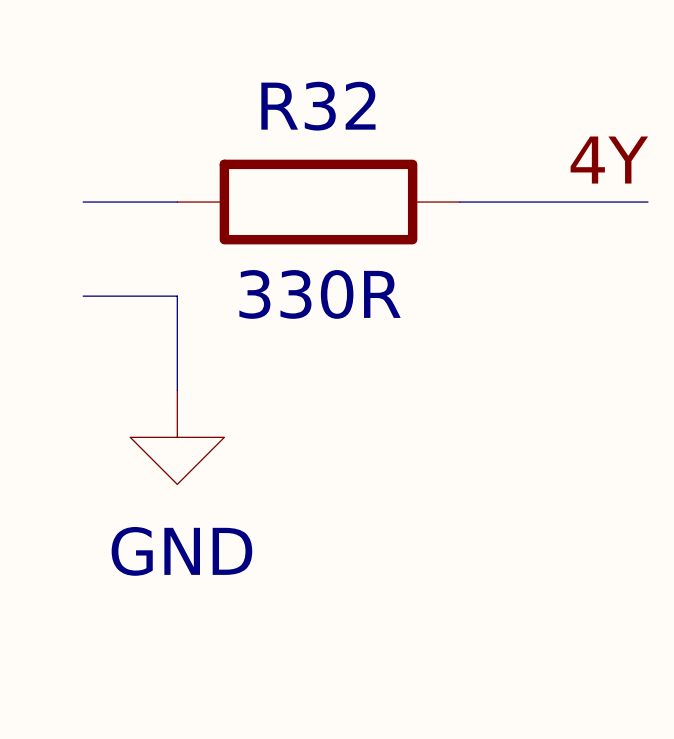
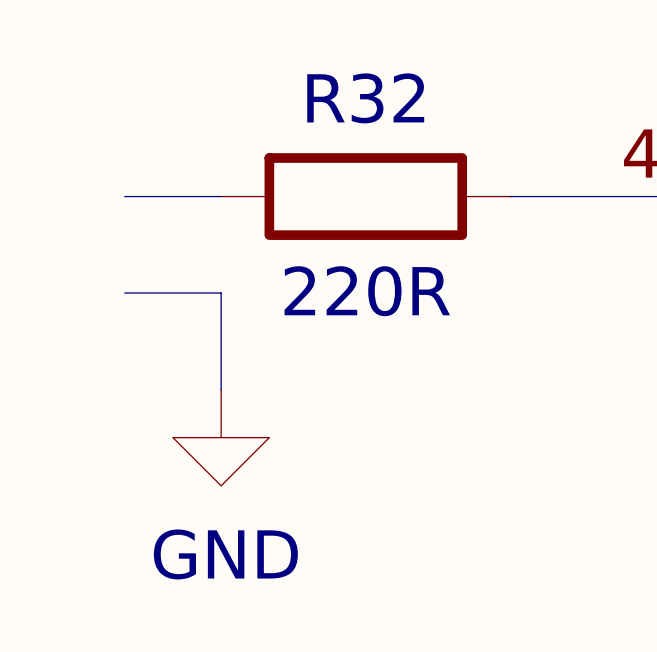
R32 value: 330R (320, 294) -> 220R (367, 291)

